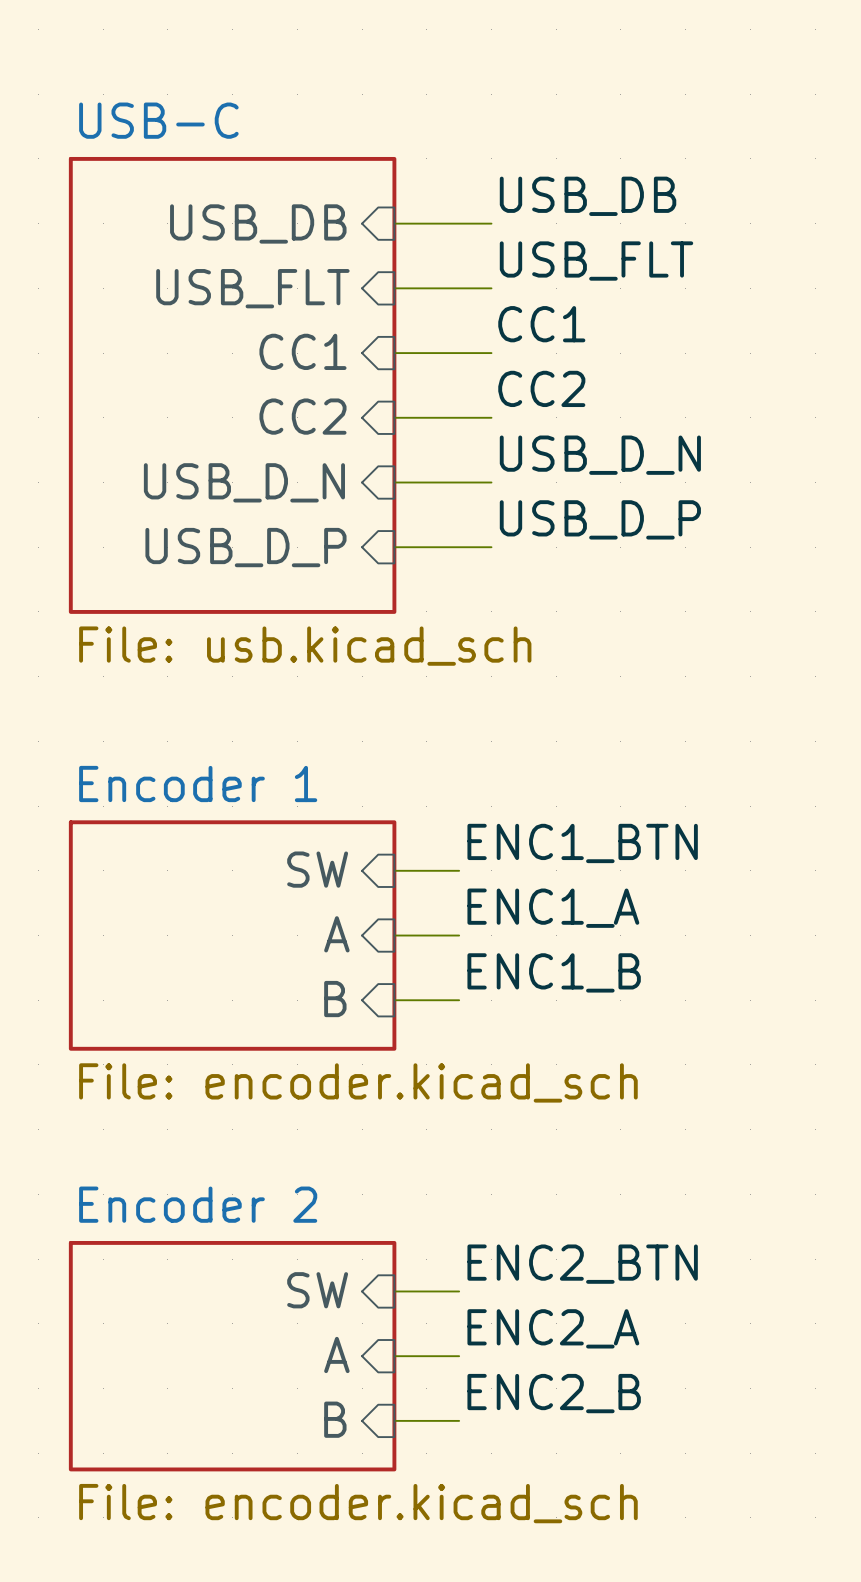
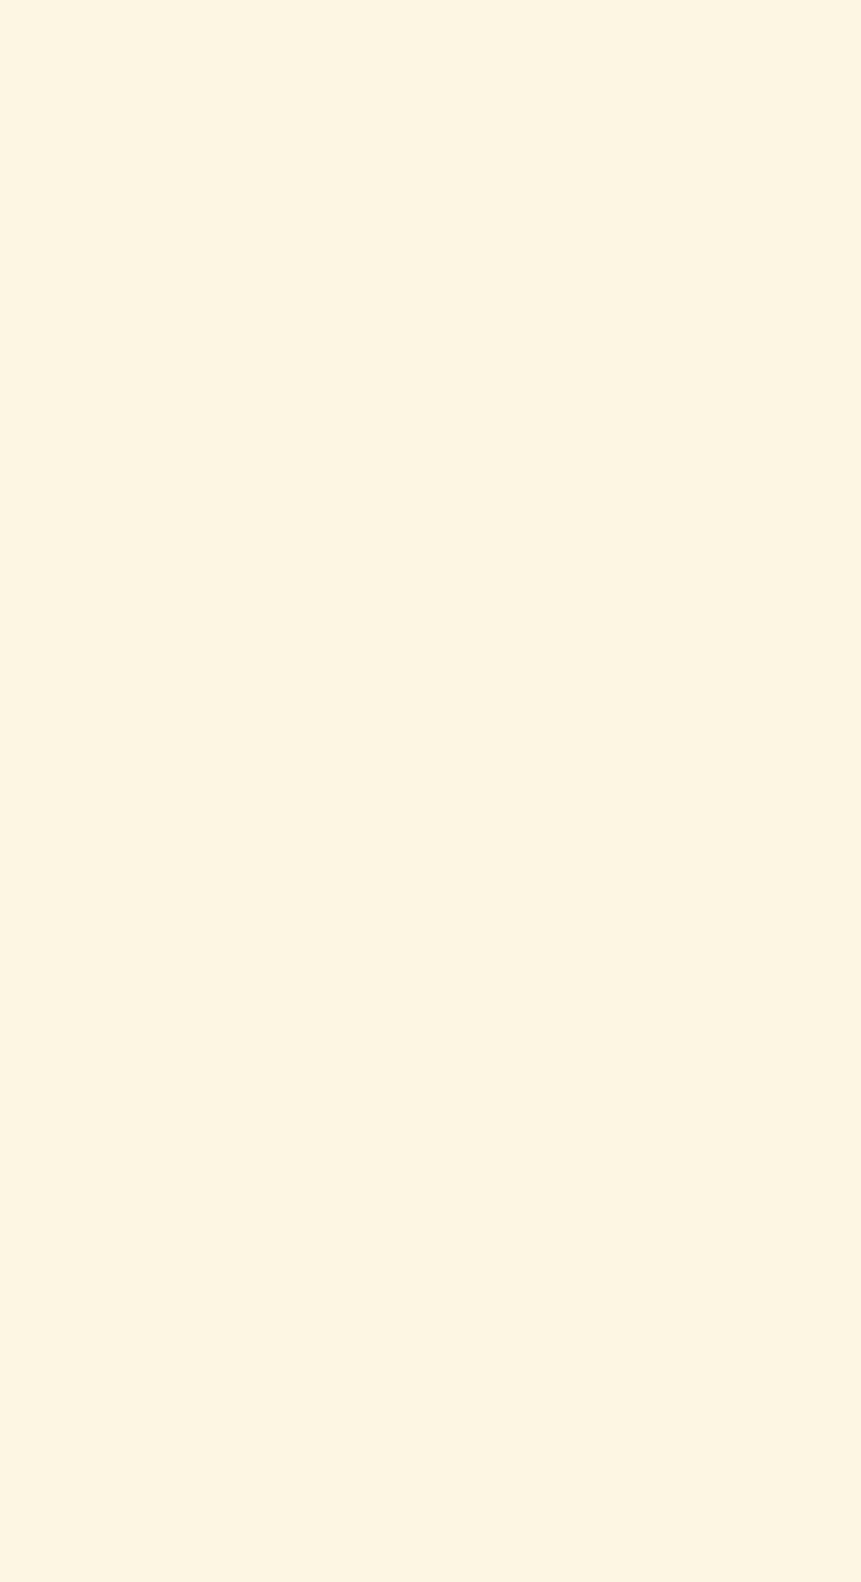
label: USB_DB (588, 196) -> none
sheet pin: USB_DB (258, 223) -> none
wire: (394, 223) (491, 223) -> none
label: USB_FLT (596, 261) -> none
sheet pin: USB_FLT (252, 288) -> none
wire: (394, 288) (491, 288) -> none
label: CC1 (541, 324) -> none
sheet pin: CC1 (302, 351) -> none
wire: (394, 353) (491, 353) -> none
sheet USB-C: File: usb.kicad_sch (232, 385) -> none
label: CC2 (541, 388) -> none
sheet pin: CC2 (302, 416) -> none
wire: (394, 417) (491, 417) -> none
label: USB_D_N (600, 455) -> none
sheet pin: USB_D_N (244, 482) -> none
wire: (394, 482) (491, 482) -> none
label: USB_D_P (600, 519) -> none
sheet pin: USB_D_P (245, 547) -> none
wire: (394, 547) (491, 547) -> none
label: ENC1_BTN (582, 843) -> none
sheet pin: SW (317, 869) -> none
wire: (394, 870) (459, 870) -> none
label: ENC1_A (553, 908) -> none
sheet pin: A (336, 934) -> none
sheet Encoder 1: File: encoder.kicad_sch (232, 935) -> none
wire: (394, 935) (459, 935) -> none
label: ENC1_B (554, 972) -> none
sheet pin: B (335, 999) -> none
wire: (394, 1000) (459, 1000) -> none
label: ENC2_BTN (582, 1264) -> none
sheet pin: SW (317, 1290) -> none
wire: (394, 1291) (459, 1291) -> none
label: ENC2_A (553, 1328) -> none
sheet pin: A (336, 1354) -> none
sheet Encoder 2: File: encoder.kicad_sch (232, 1356) -> none
wire: (394, 1356) (459, 1356) -> none
label: ENC2_B (554, 1393) -> none
sheet pin: B (335, 1419) -> none
wire: (394, 1420) (459, 1420) -> none

